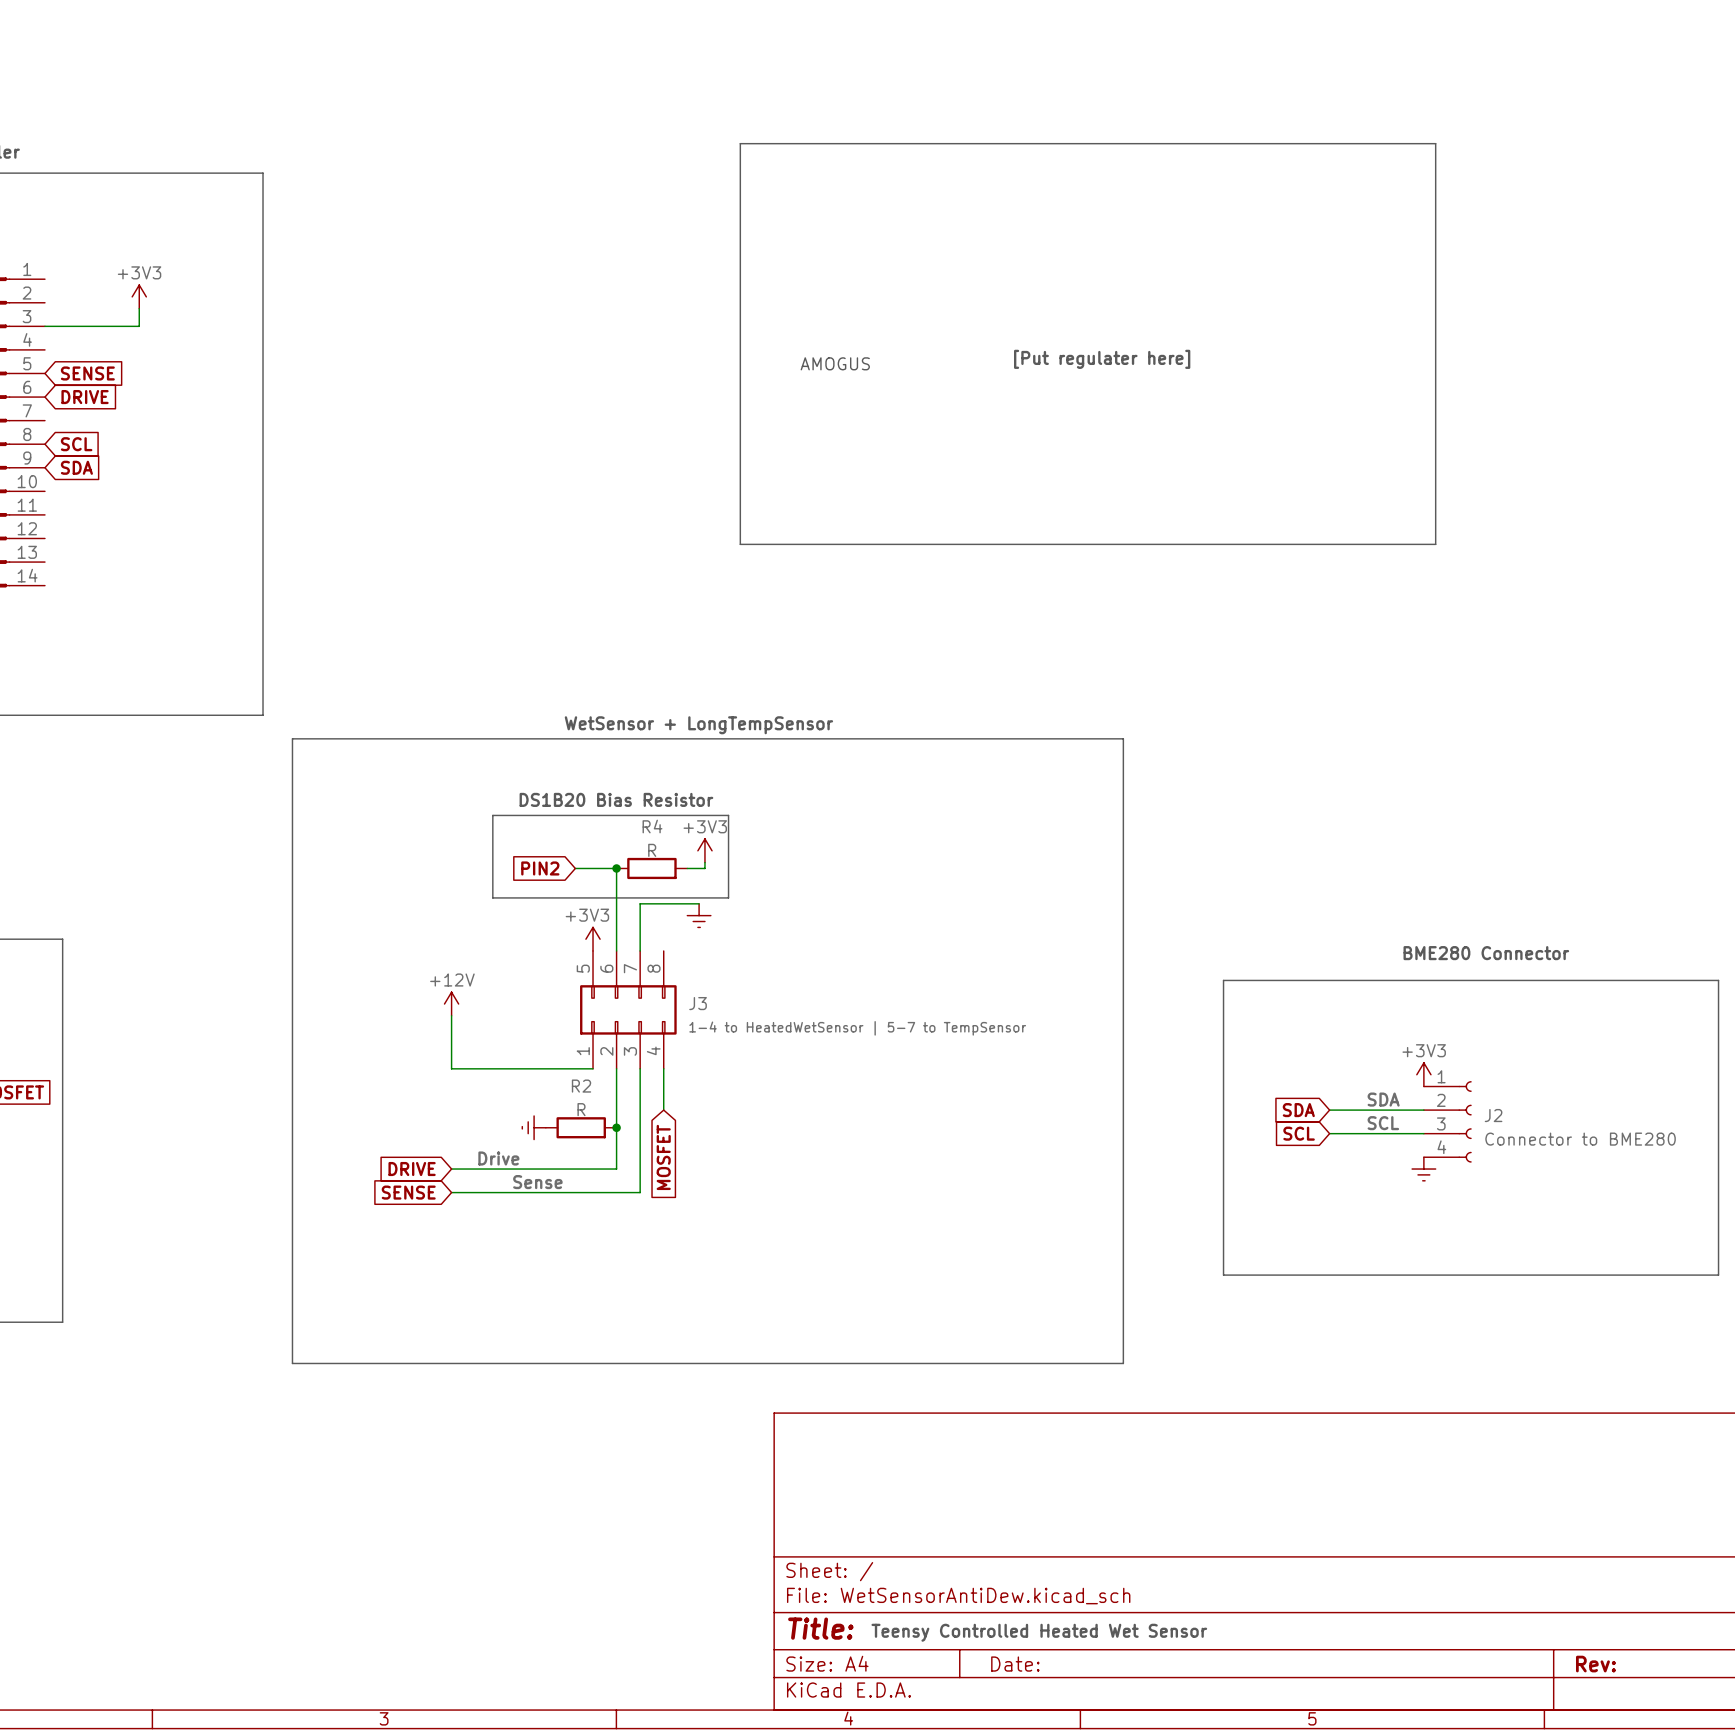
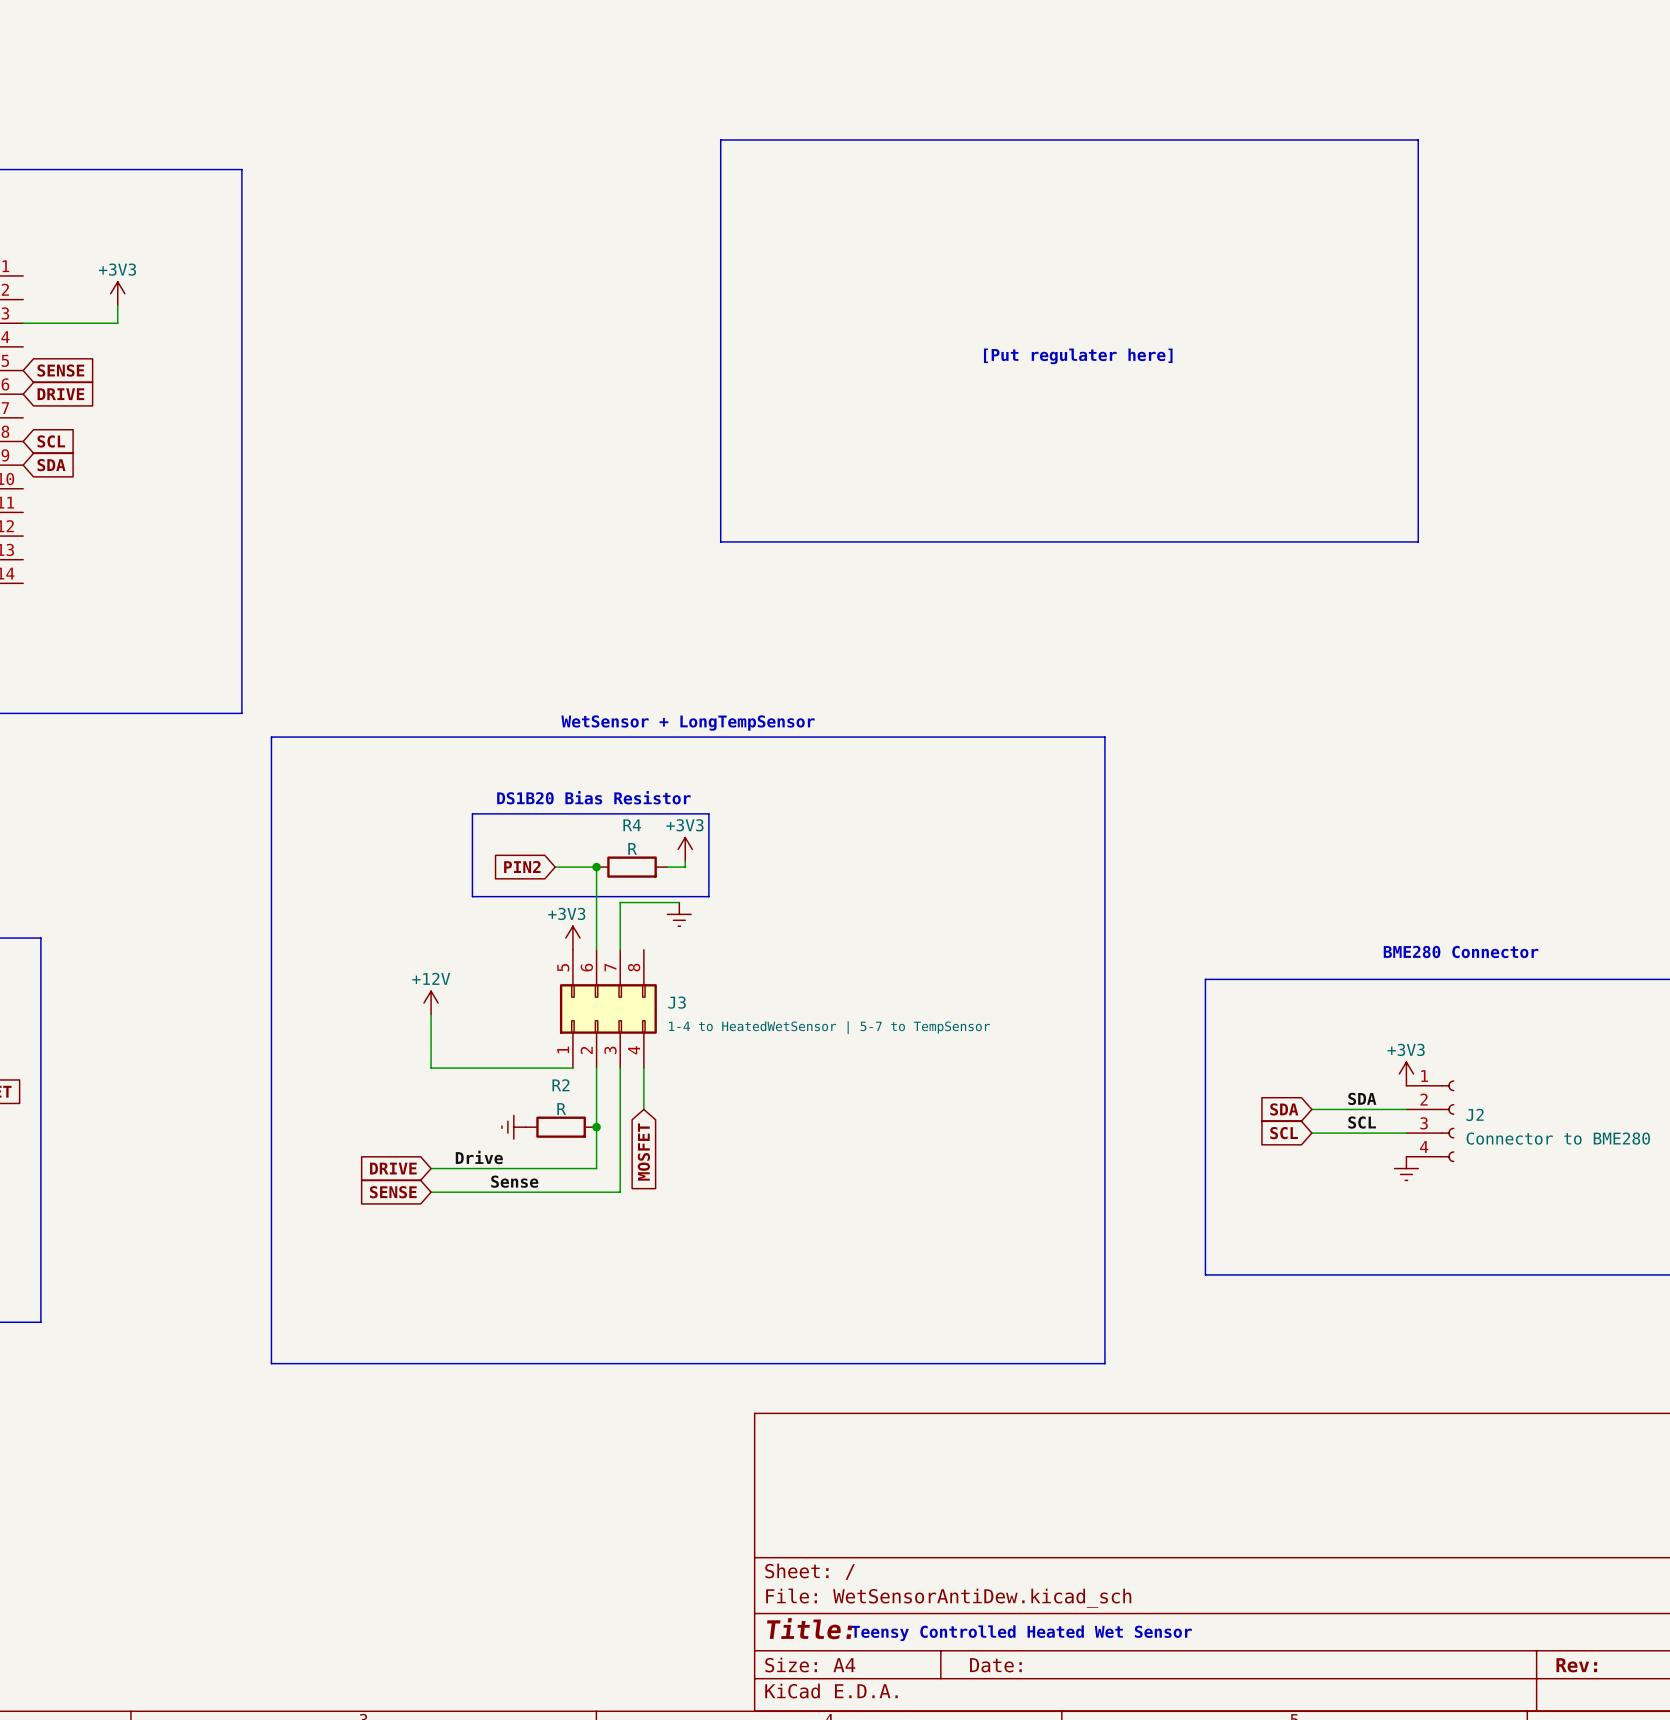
text: AMOGUS (835, 363) -> none

